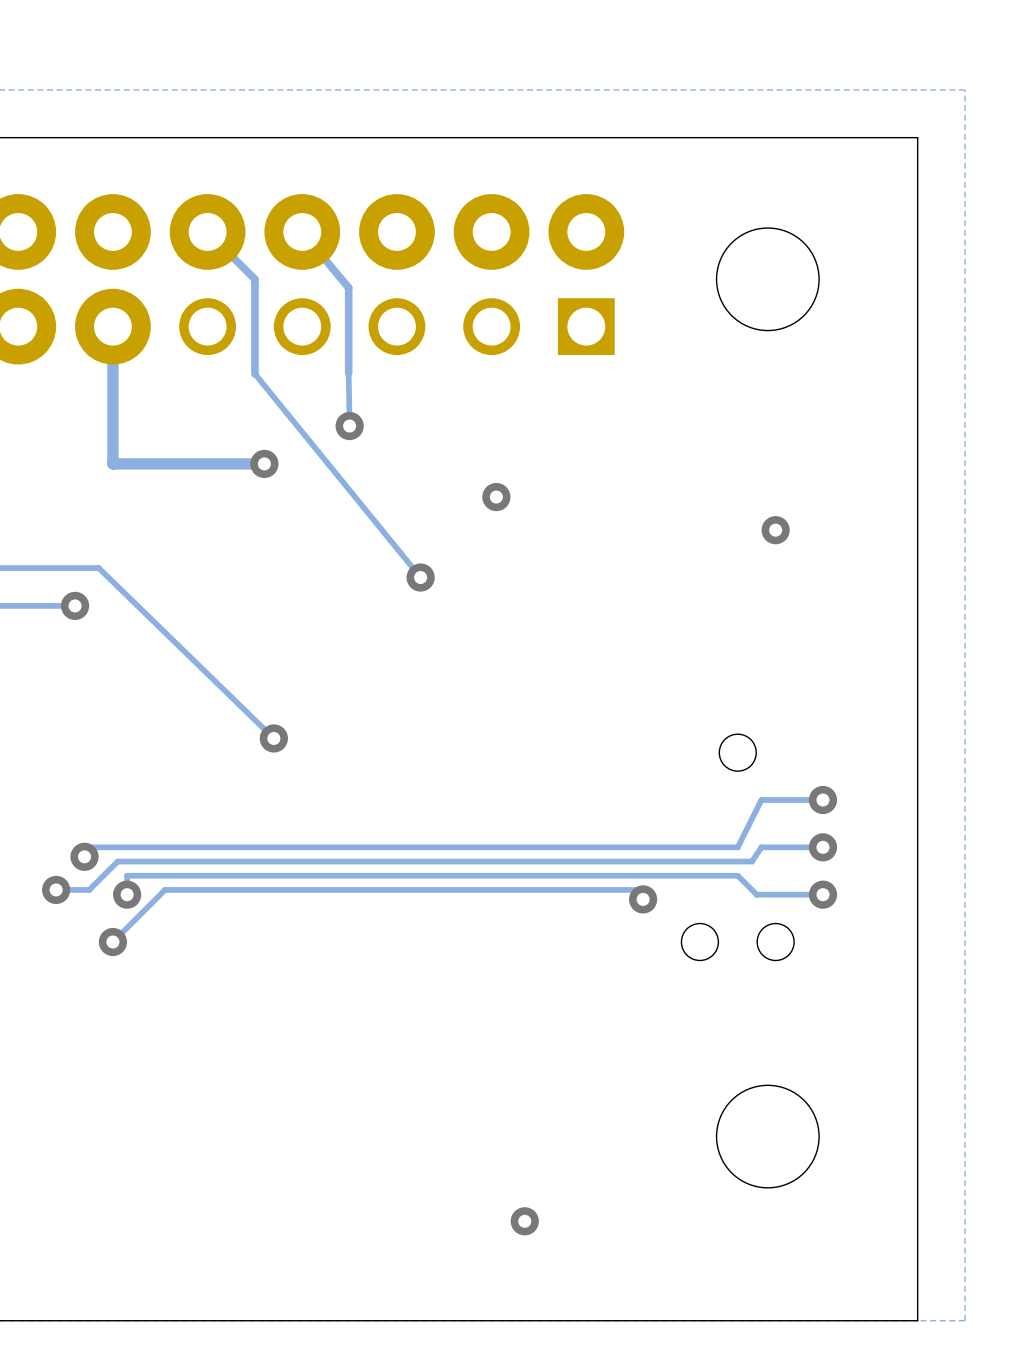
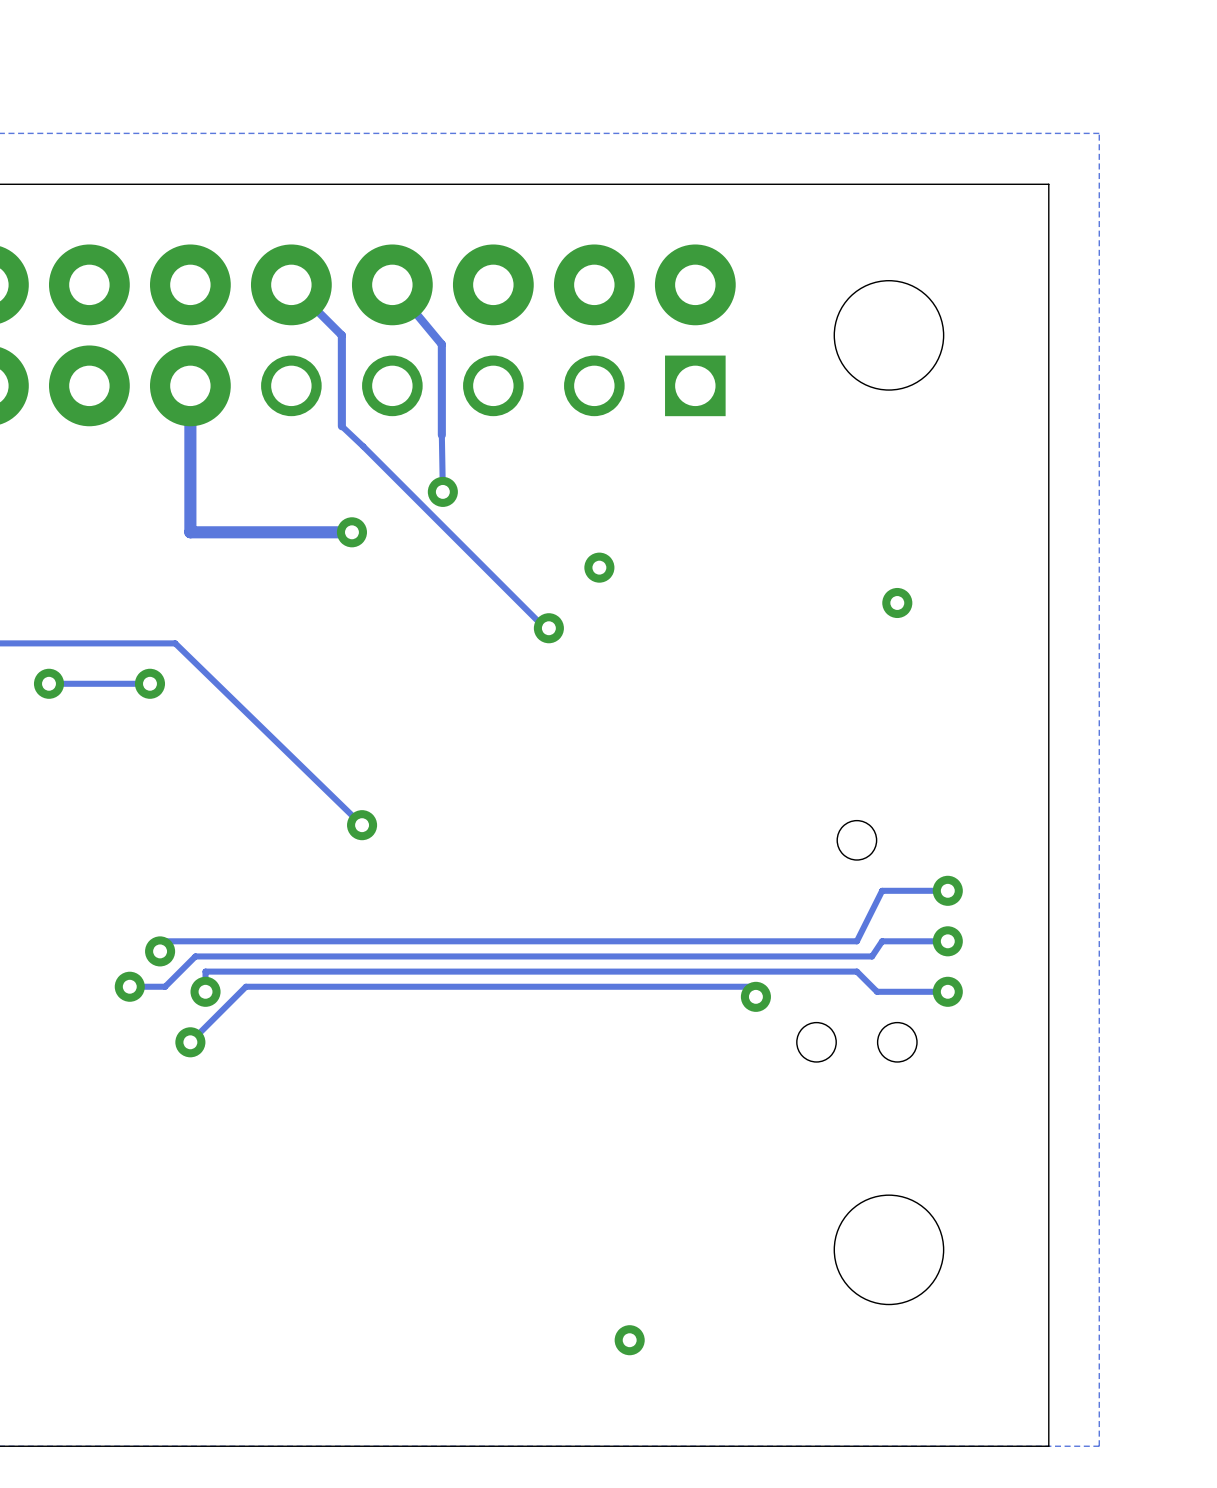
track: (254, 364) (254, 373) (420, 577) -> (341, 426) (545, 628) (548, 628)
via position: (420, 577) -> (548, 628)

